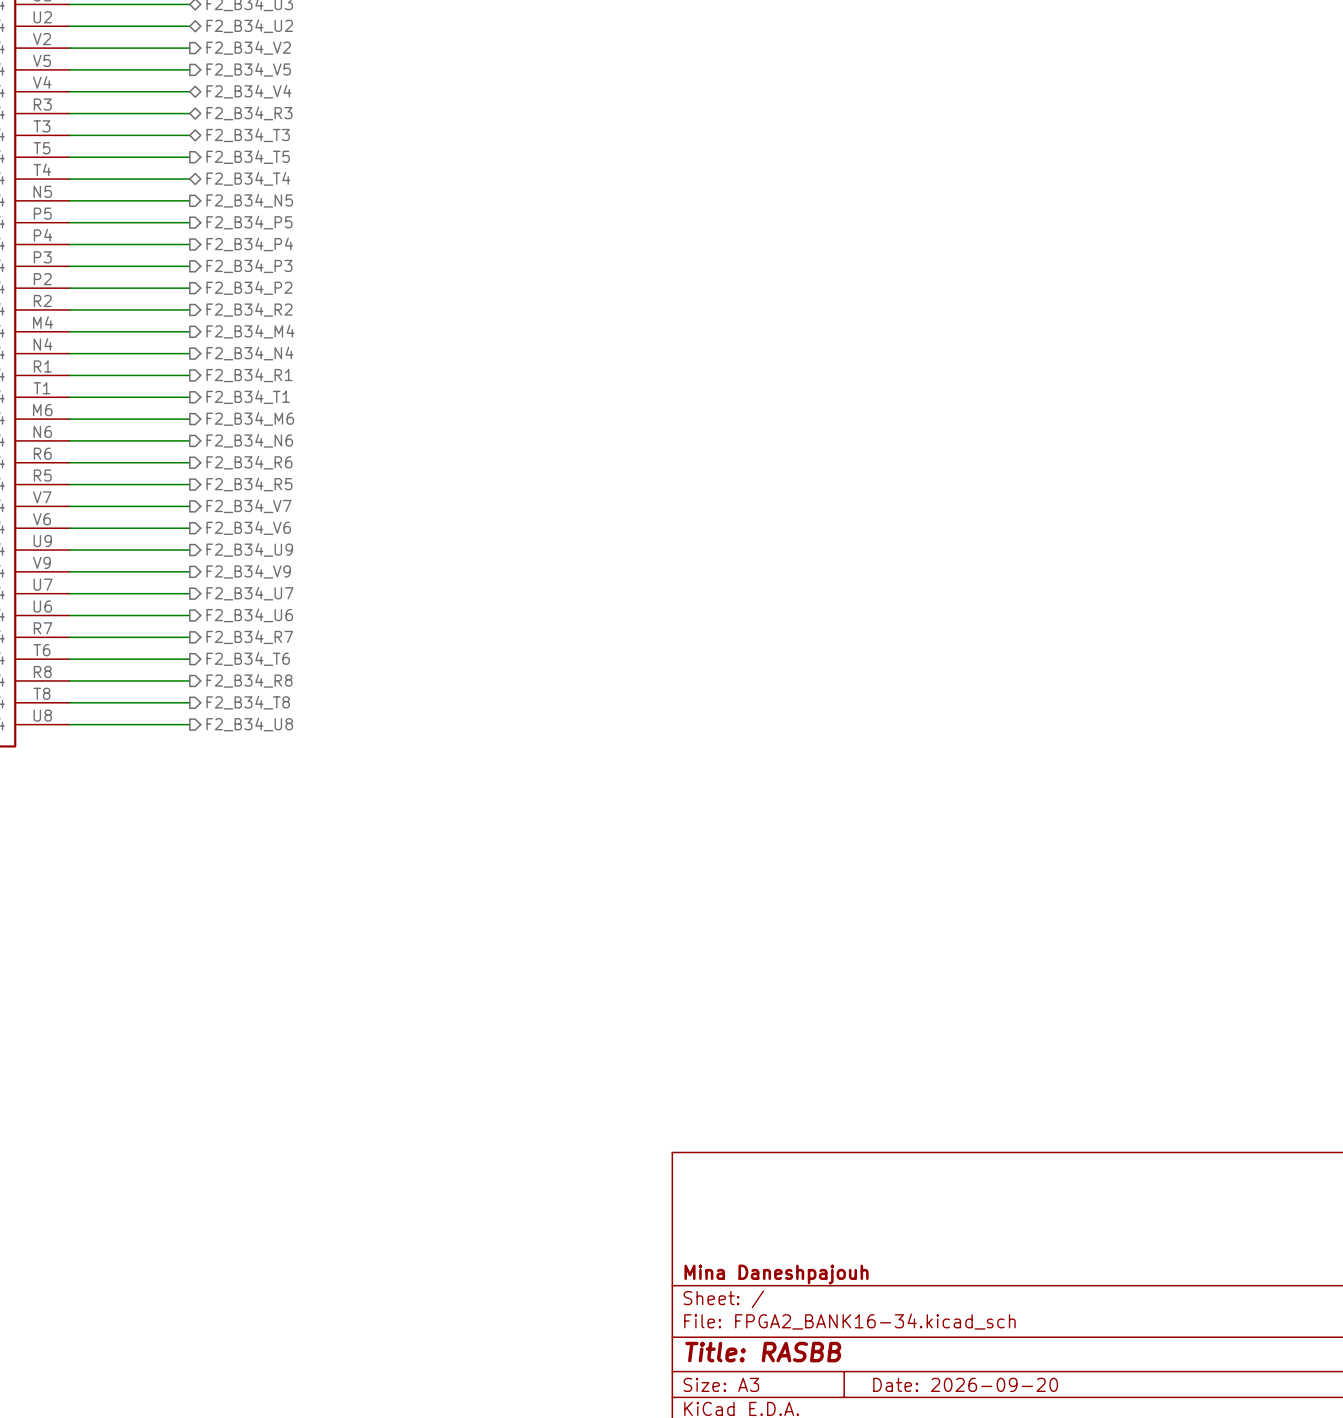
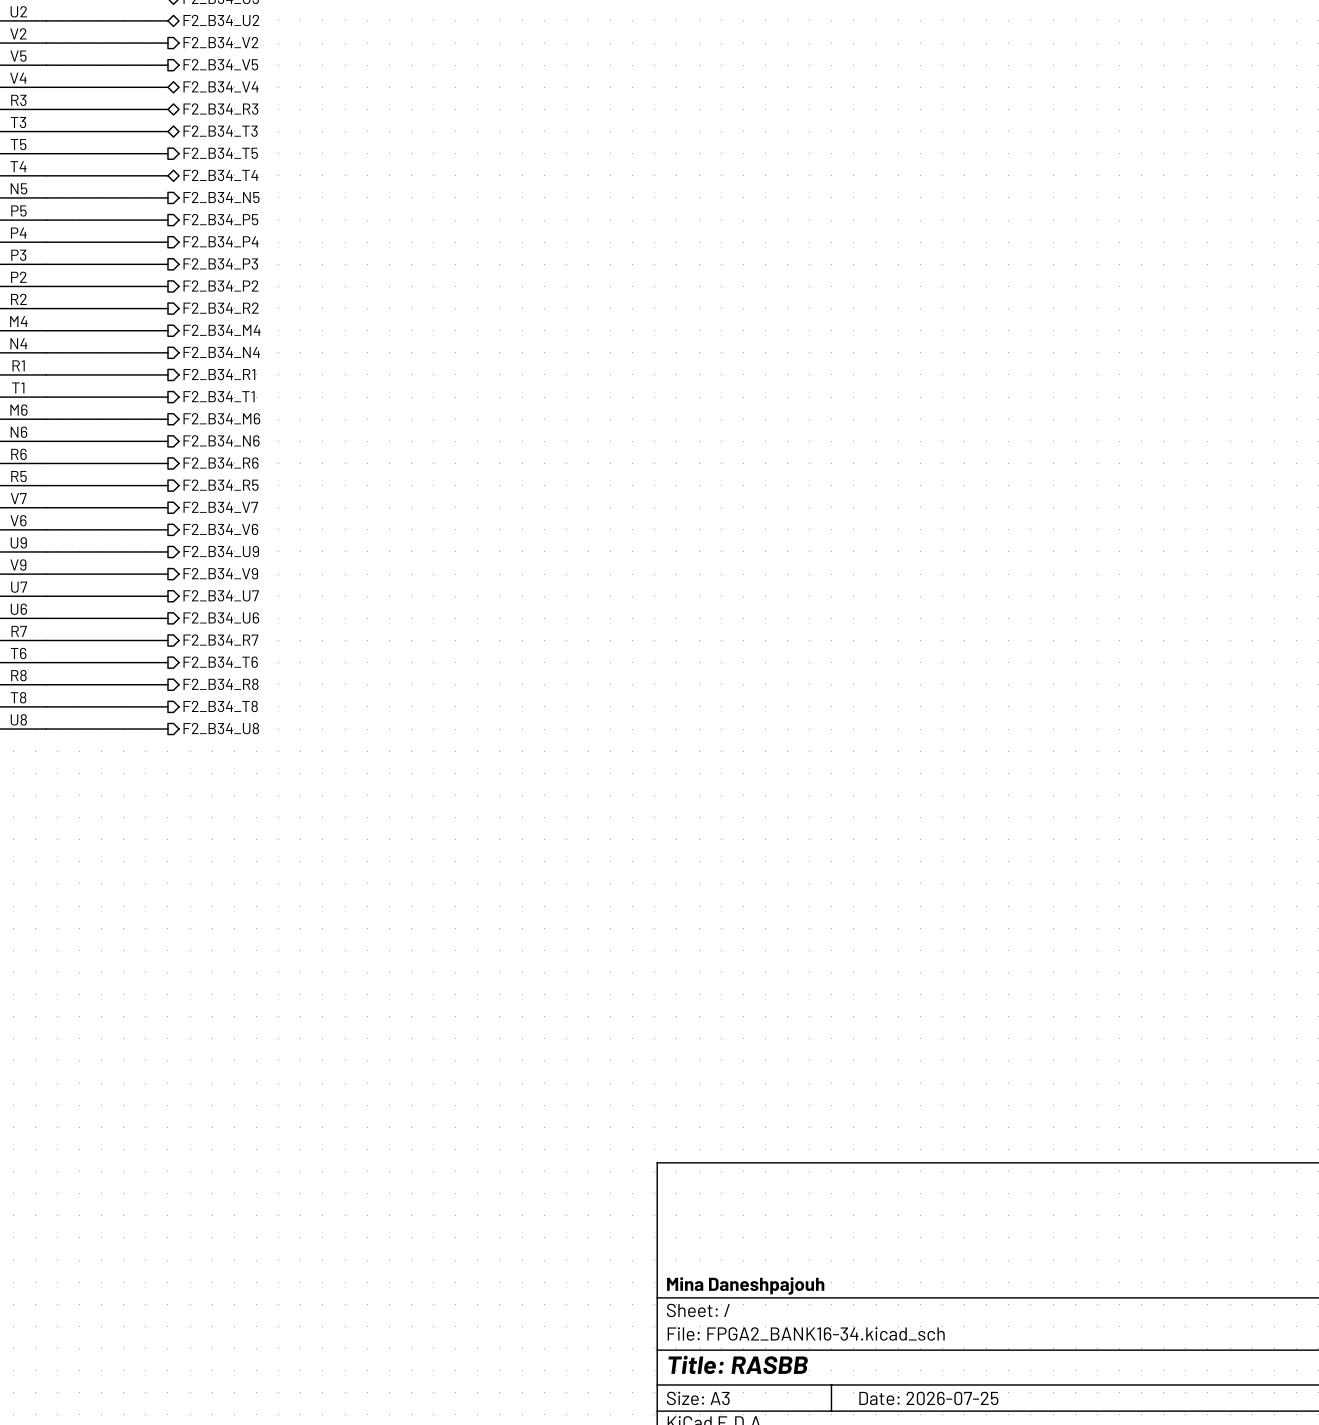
title block: Date: 2026-09-20 (965, 1384) -> Date: 2026-07-25 (928, 1398)

